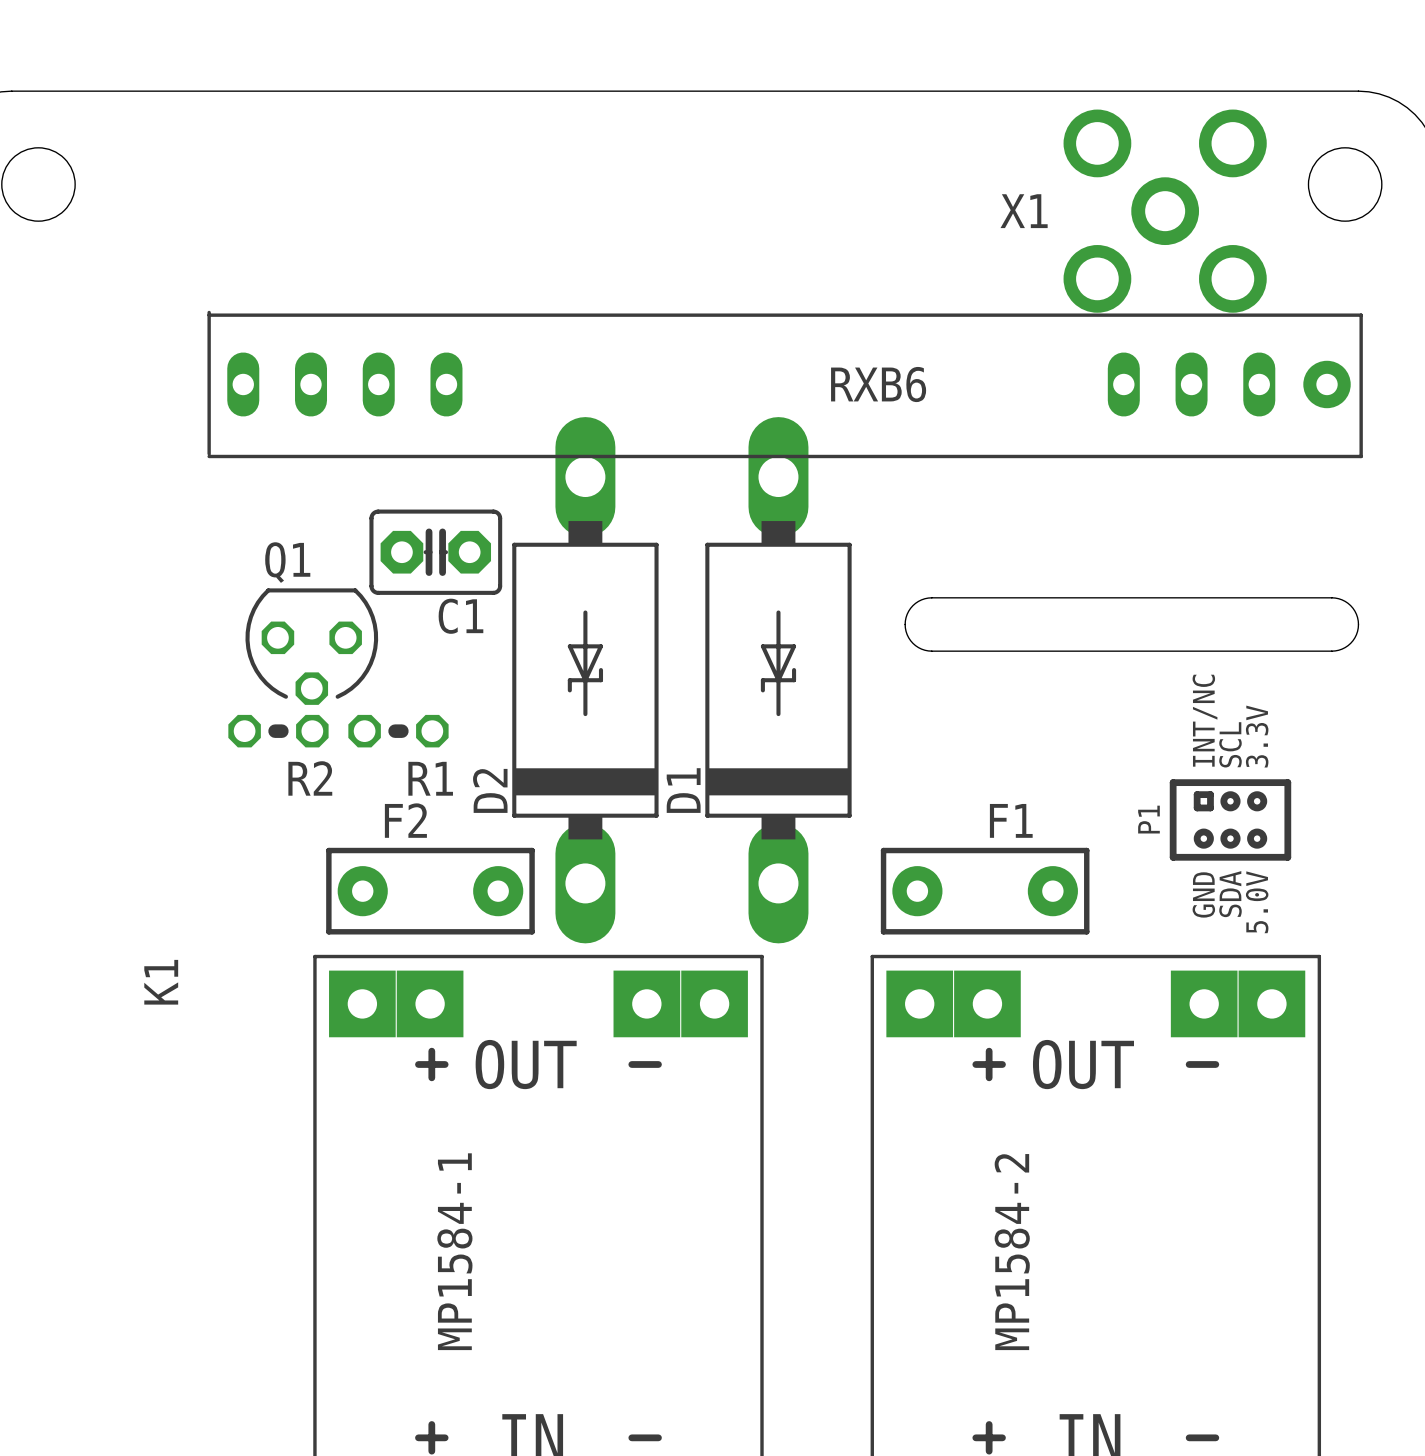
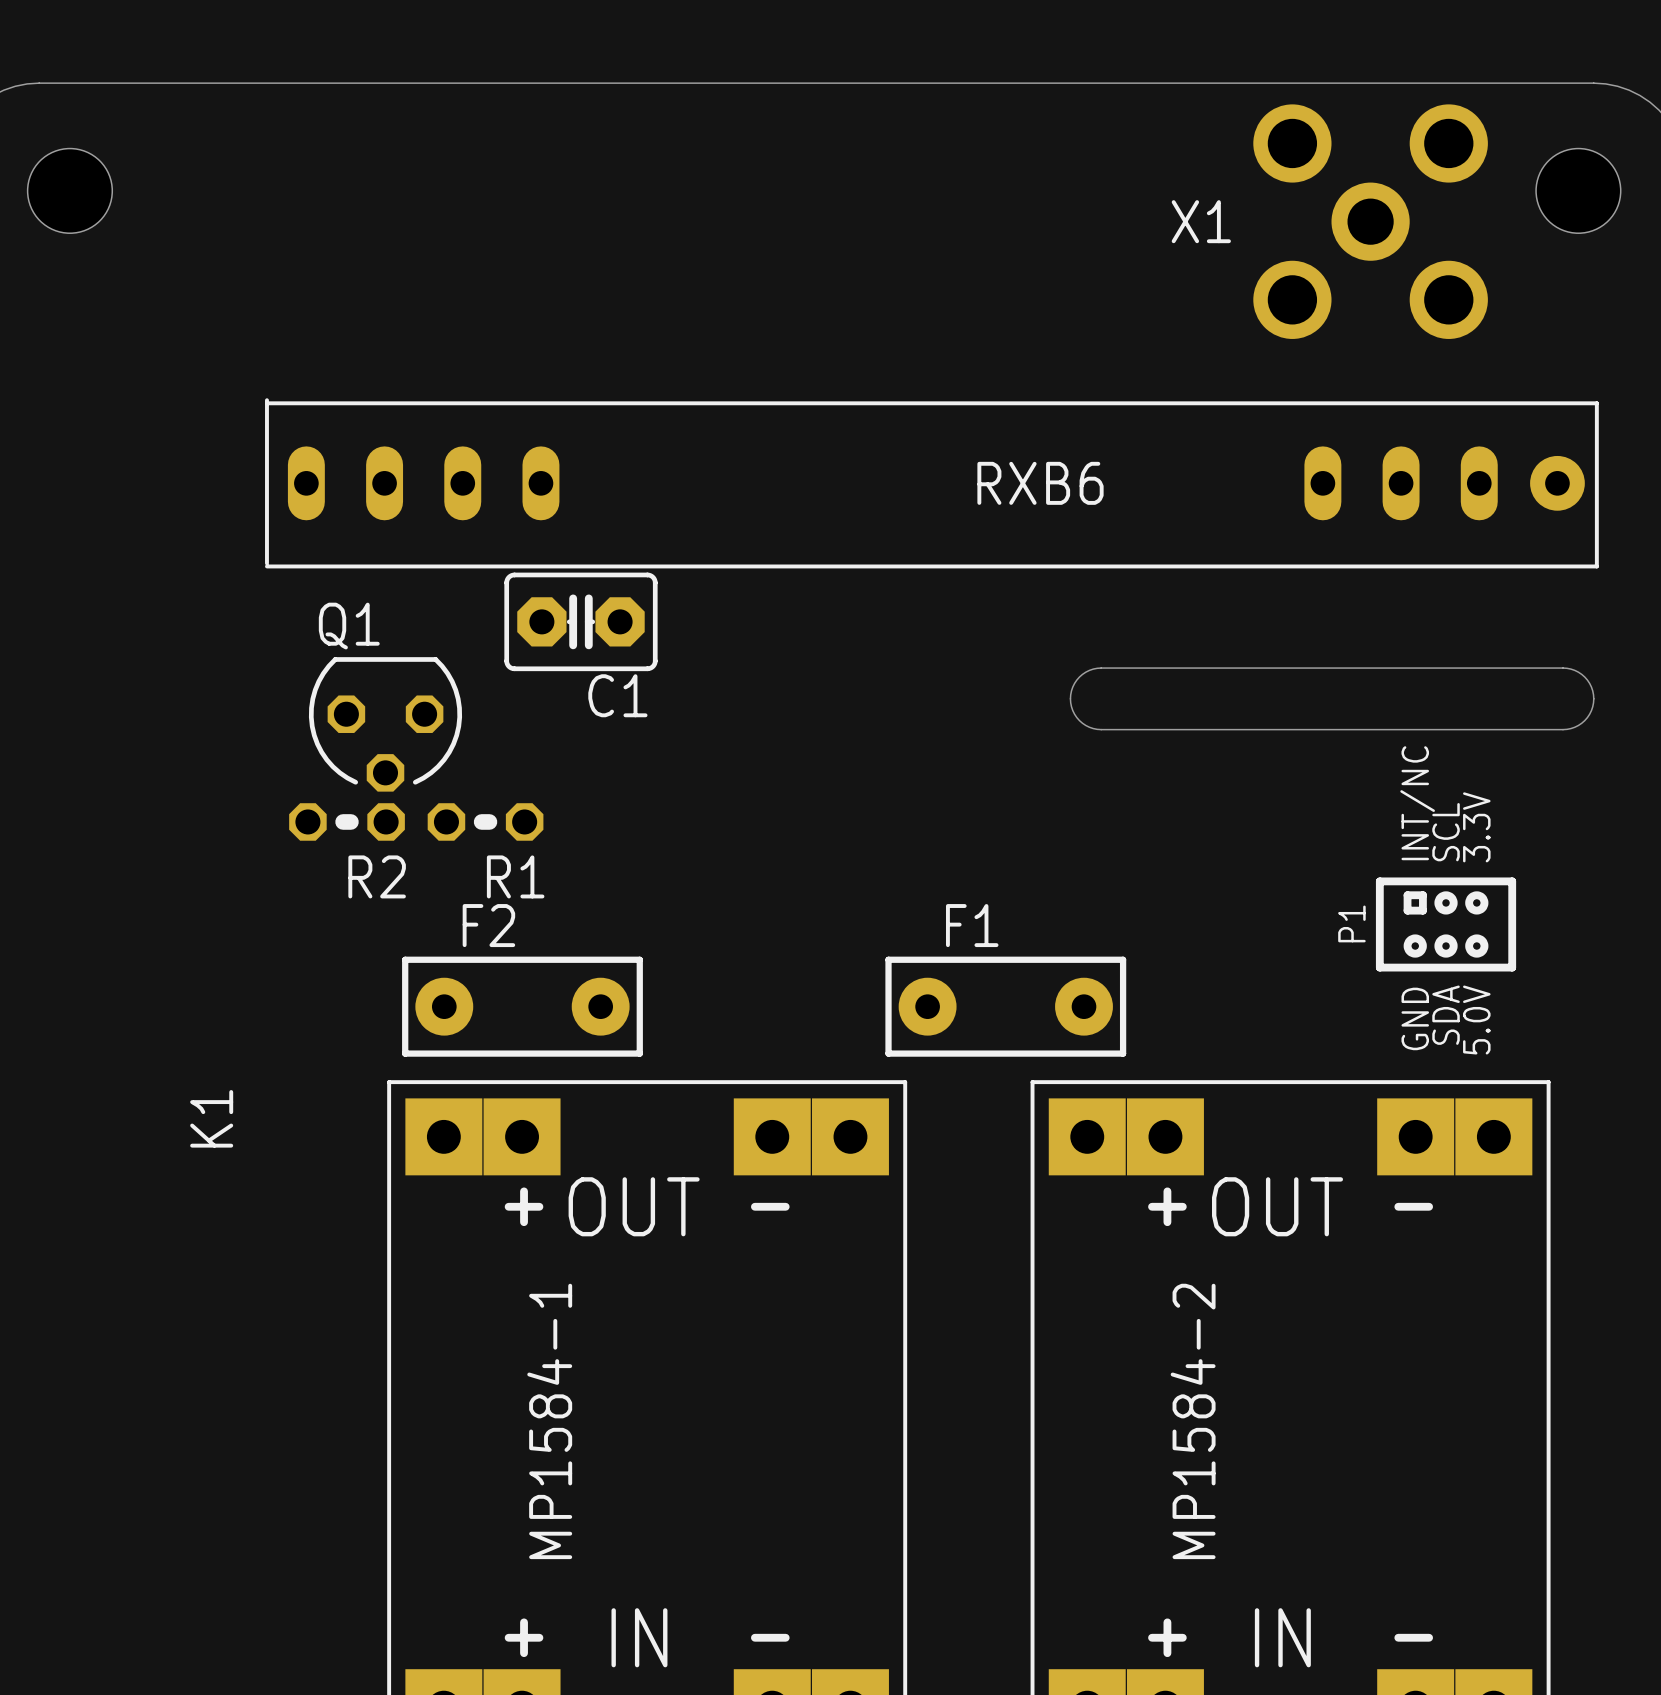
RXB6 position: (785, 384) -> (931, 483)
C1 position: (435, 552) -> (580, 621)
D2: (585, 680) -> none
D1: (778, 680) -> none
F1 name position: F1 (1011, 820) -> F1 (972, 925)
F1 position: (985, 891) -> (1005, 1006)

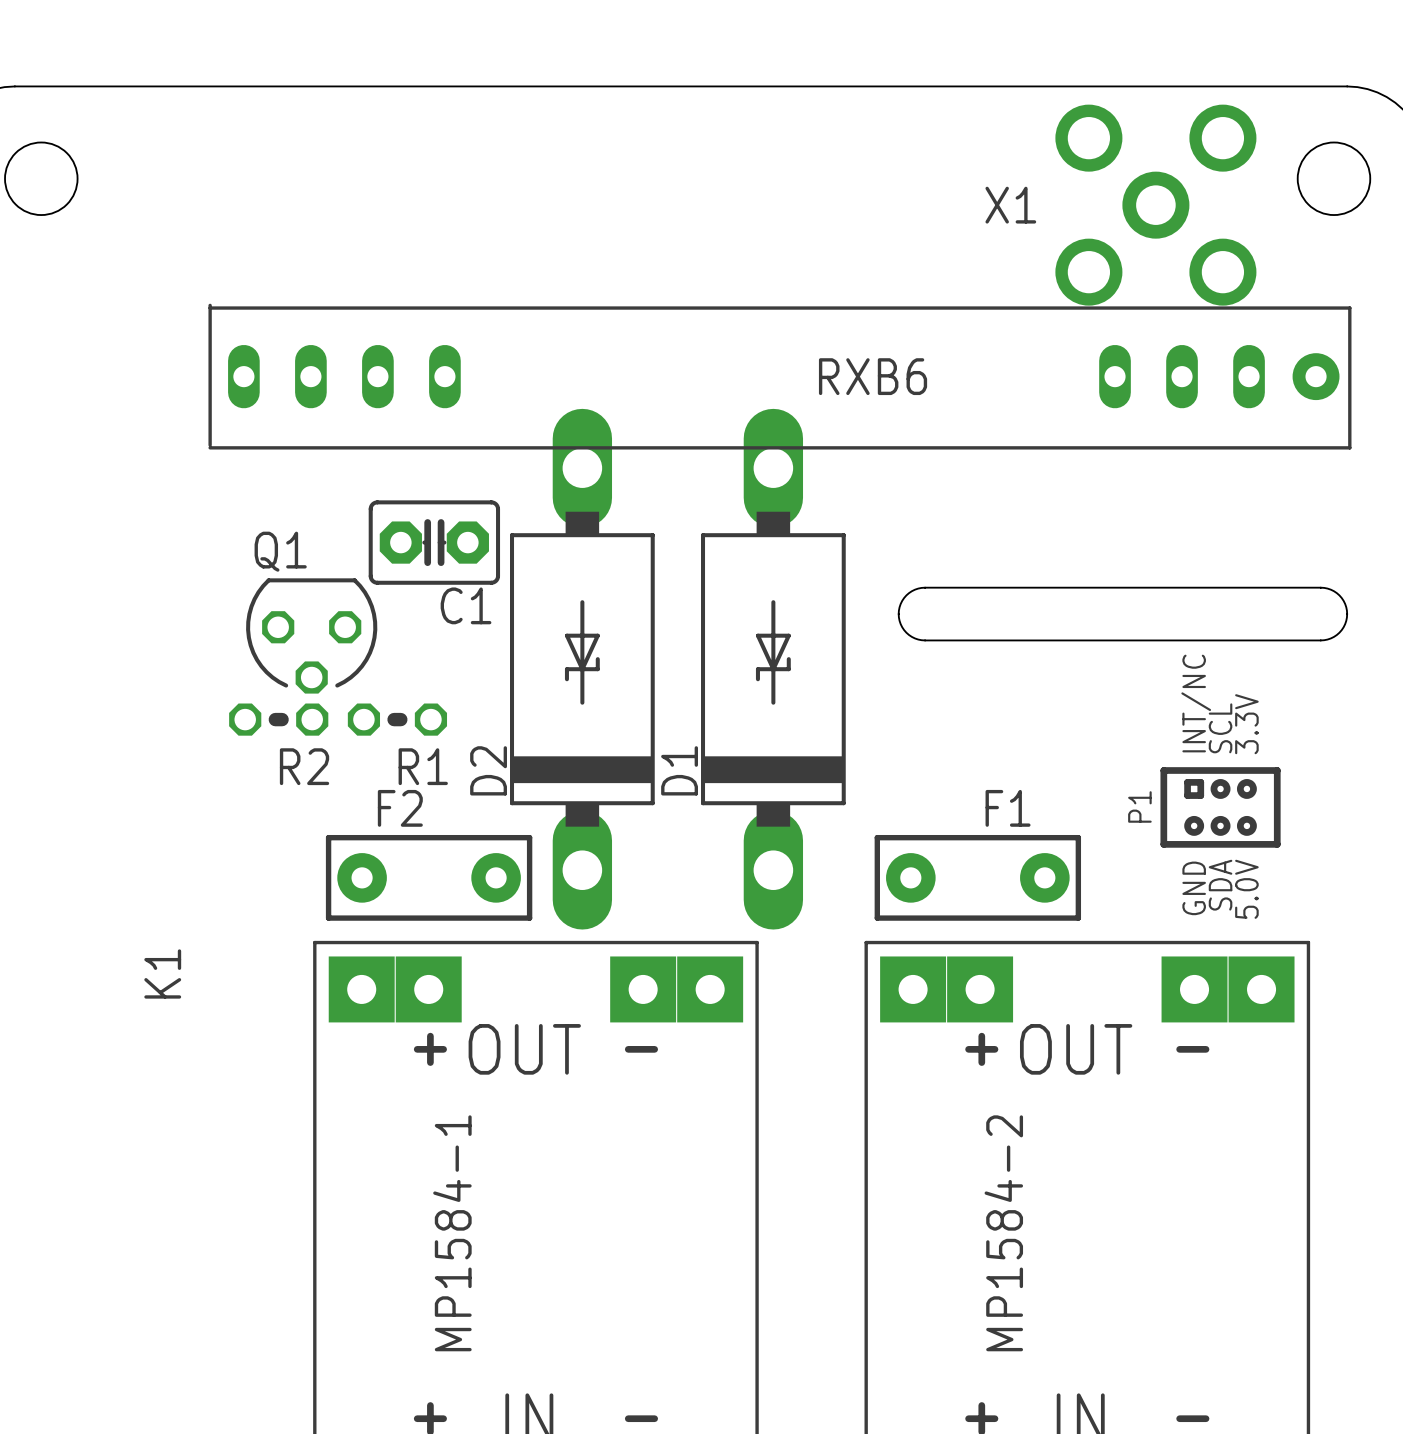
RXB6 position: (931, 483) -> (779, 376)
C1 position: (580, 621) -> (434, 542)
D2: none -> (582, 669)
D1: none -> (773, 669)
F1 name position: F1 (972, 925) -> F1 (1008, 808)
F1 position: (1005, 1006) -> (977, 877)

